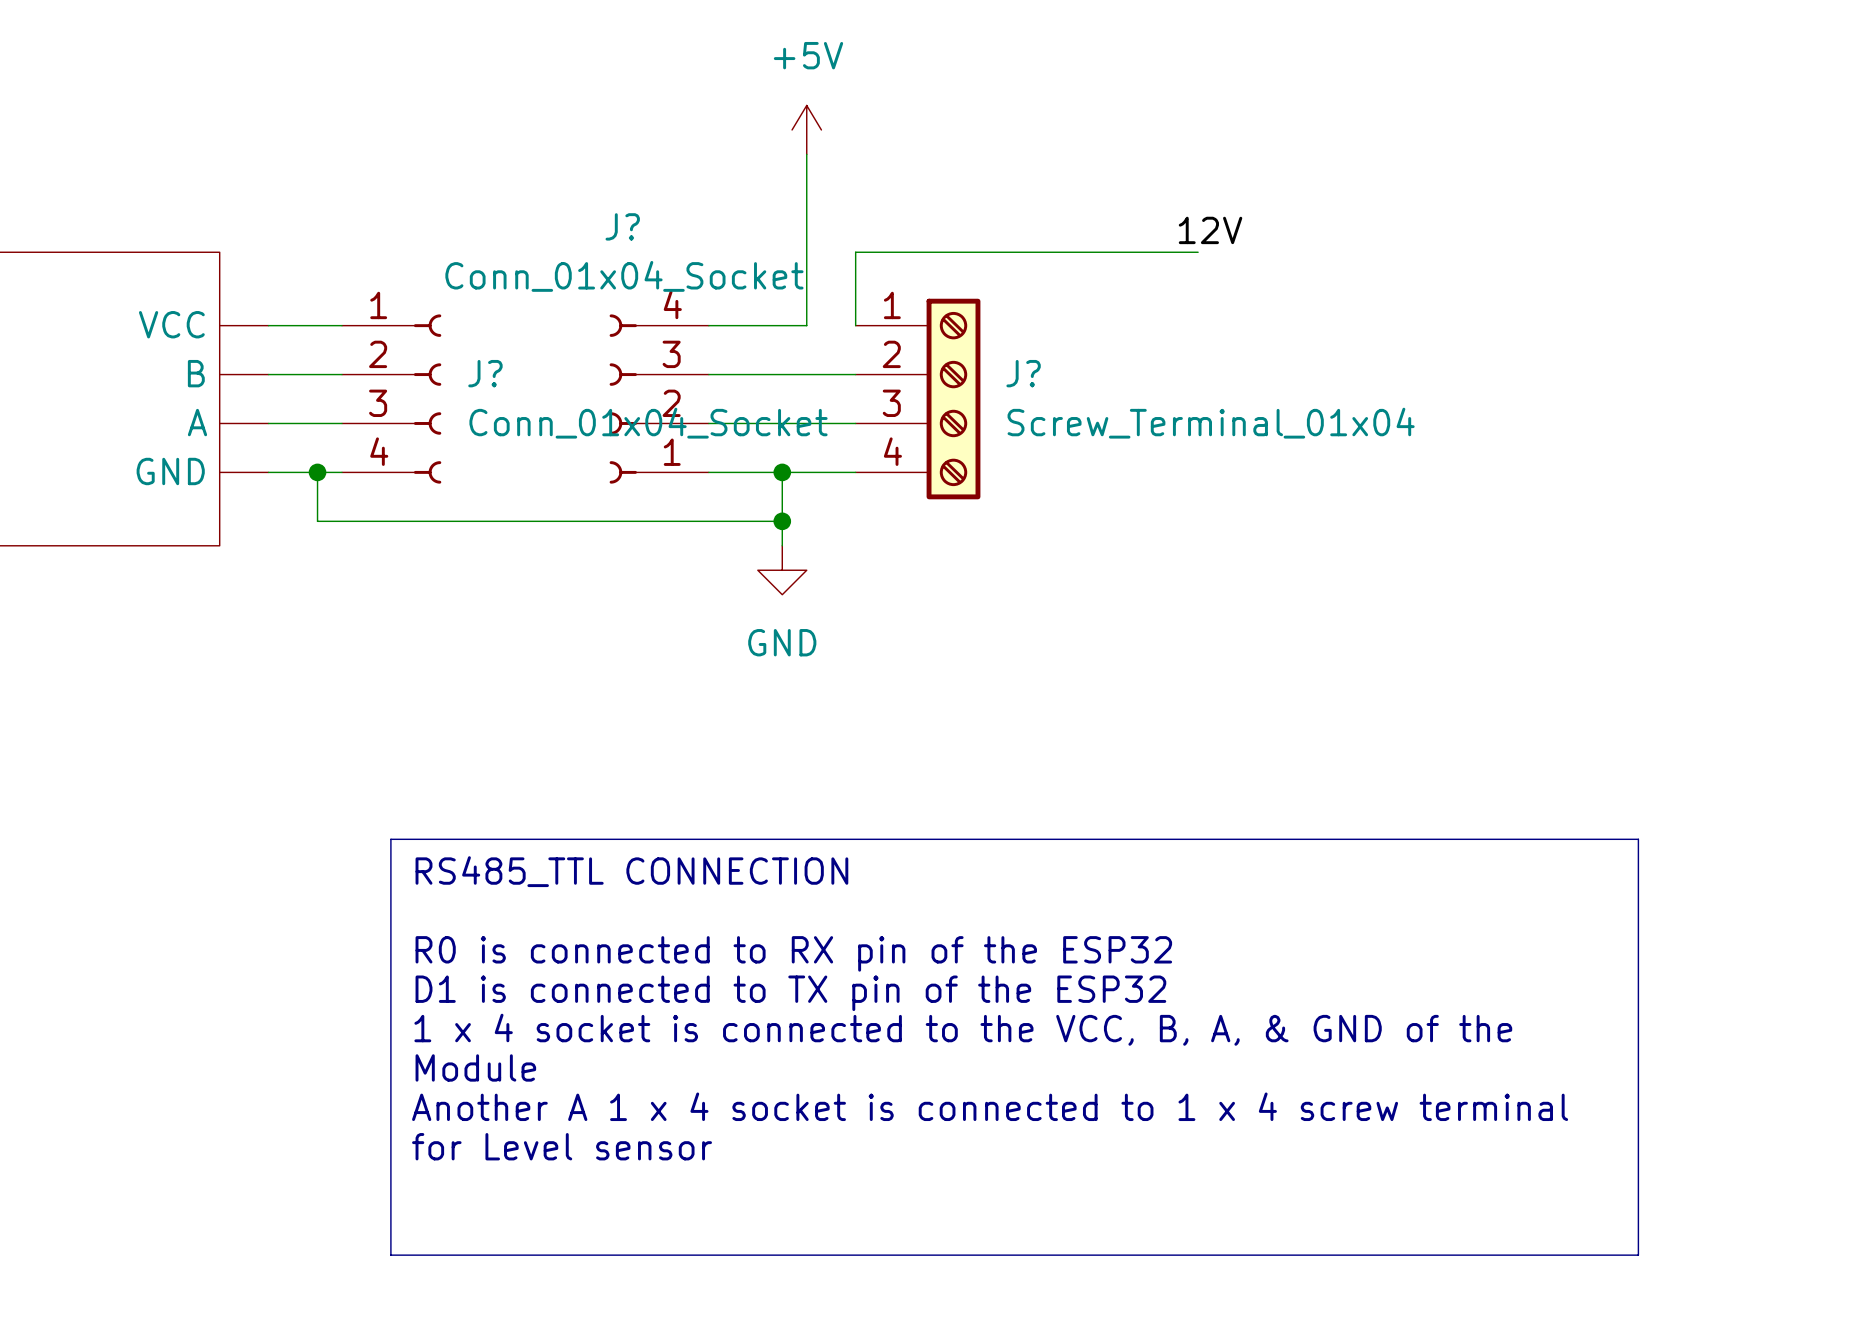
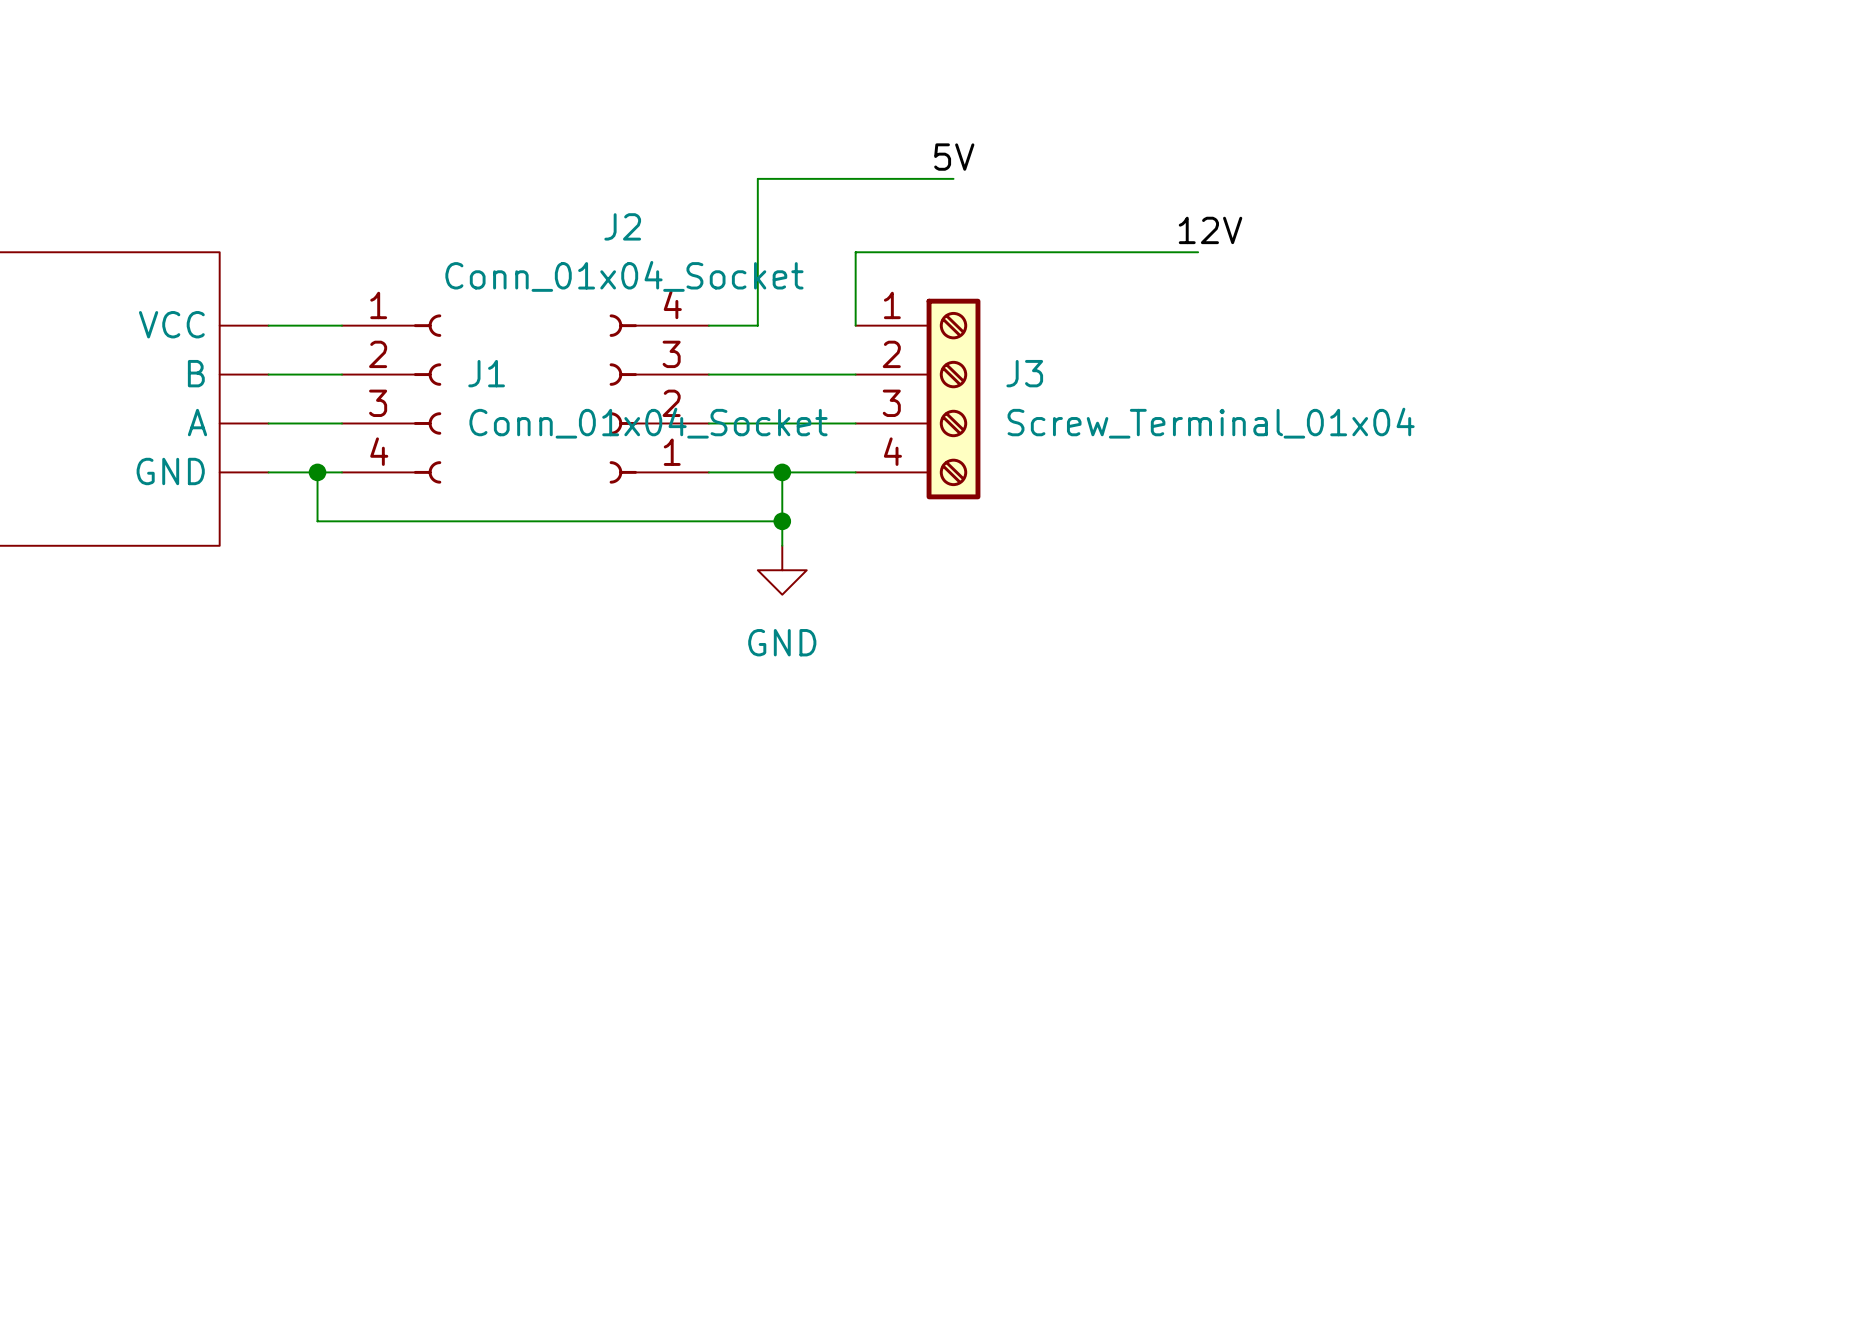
power symbol: +5V (806, 129) -> none
wire: (806, 154) (806, 325) (757, 325) -> (953, 178) (757, 178) (757, 325)
label: none -> 5V (954, 157)
J? name: J? (622, 226) -> J2 (622, 226)
J? name: J? (485, 373) -> J1 (486, 373)
J? name: J? (1023, 373) -> J3 (1024, 373)
line: (390, 839) (1638, 839) (1638, 1255) (390, 1255) (390, 839) -> none
text: RS485_TTL CONNECTION (631, 871) -> none
text: R0 is connected to RX pin of the ESP32 (793, 953) -> none
text: D1 is connected to TX pin of the ESP32 (790, 993) -> none
text: 1 x 4 socket is connected to the VCC, B, A, & GND of the (963, 1029) -> none
text: Module (475, 1067) -> none
text: Another A 1 x 4 socket is connected to 1 x 4 screw terminal (990, 1106) -> none
text: for Level sensor (562, 1146) -> none

